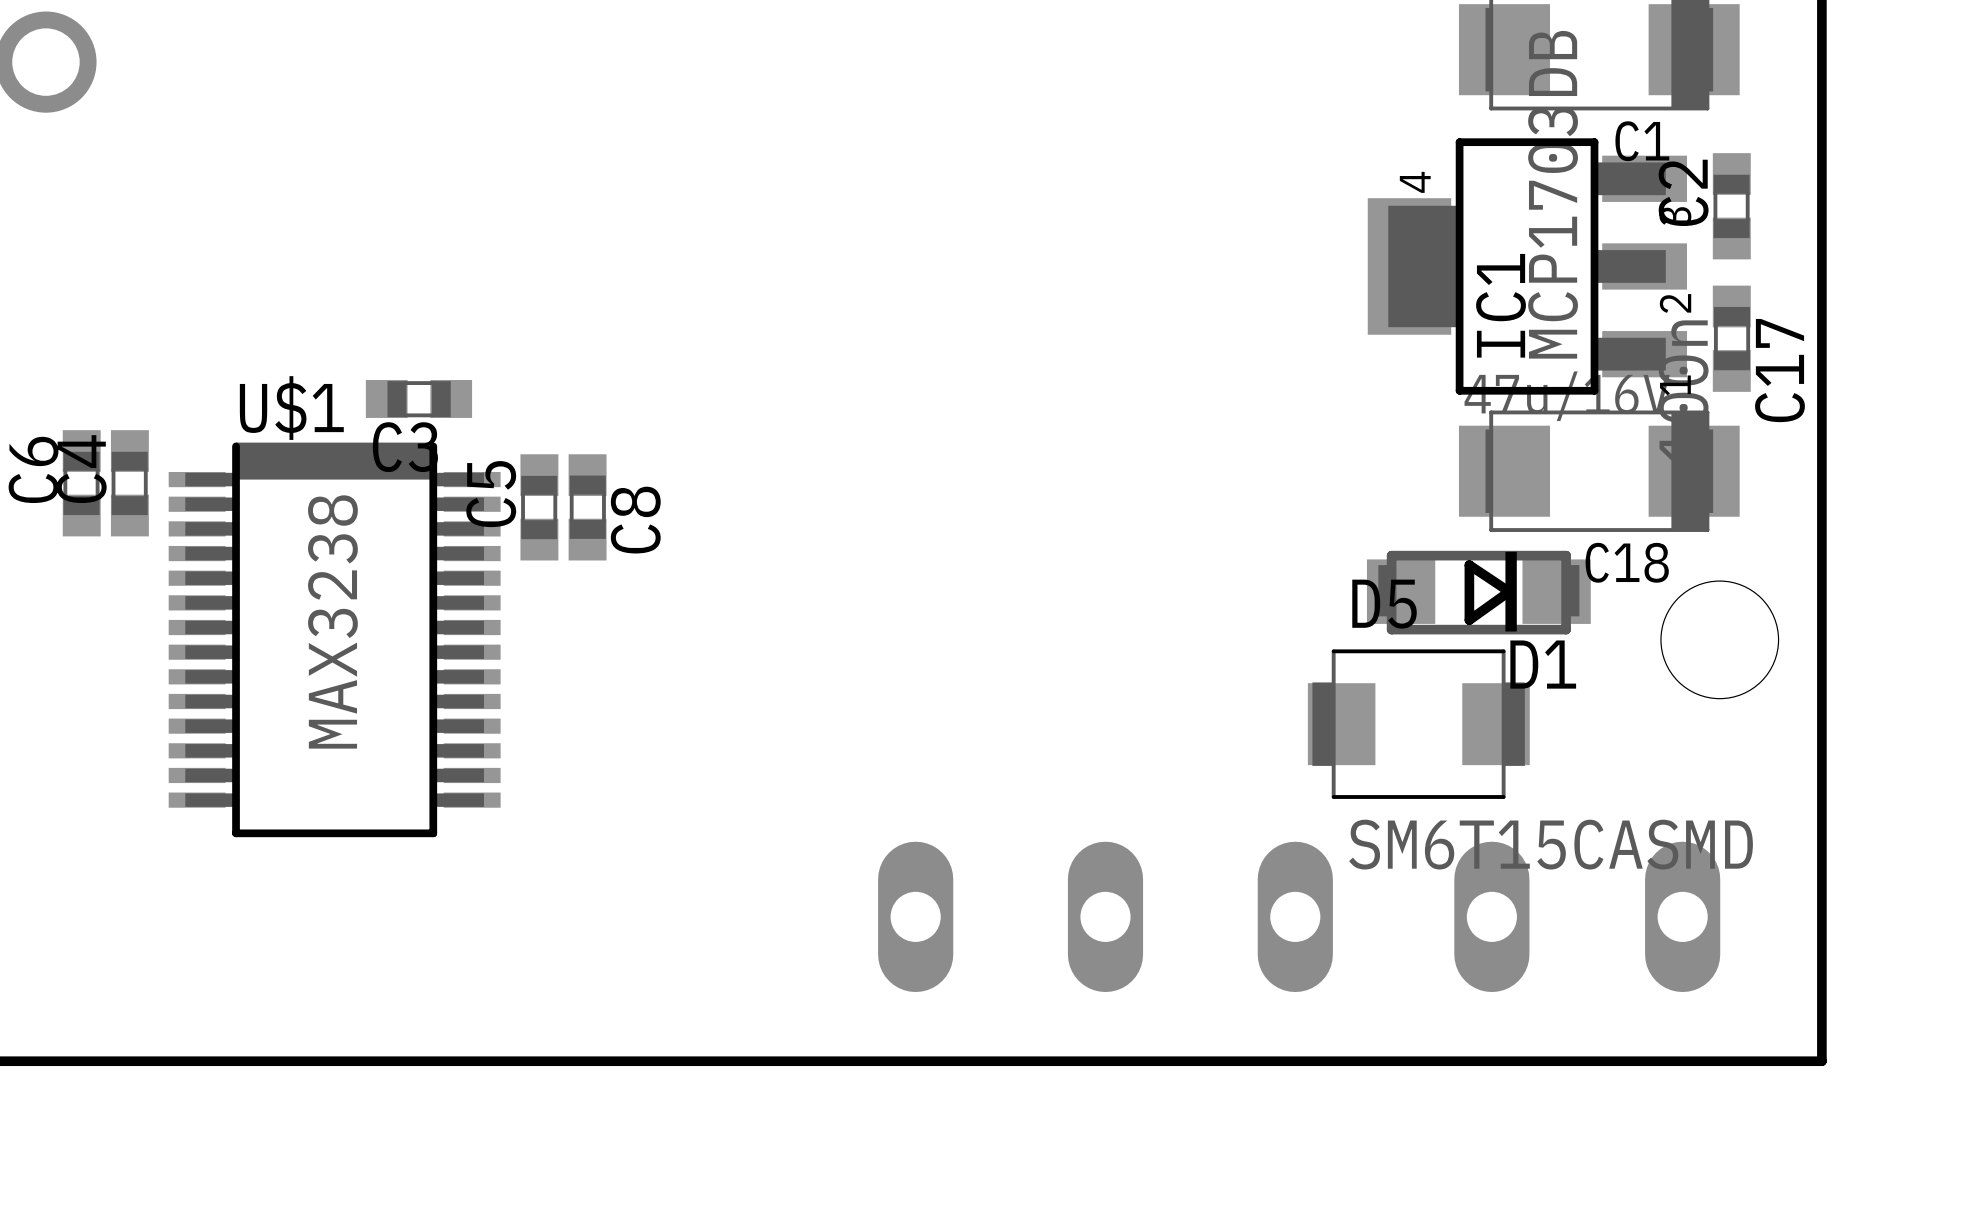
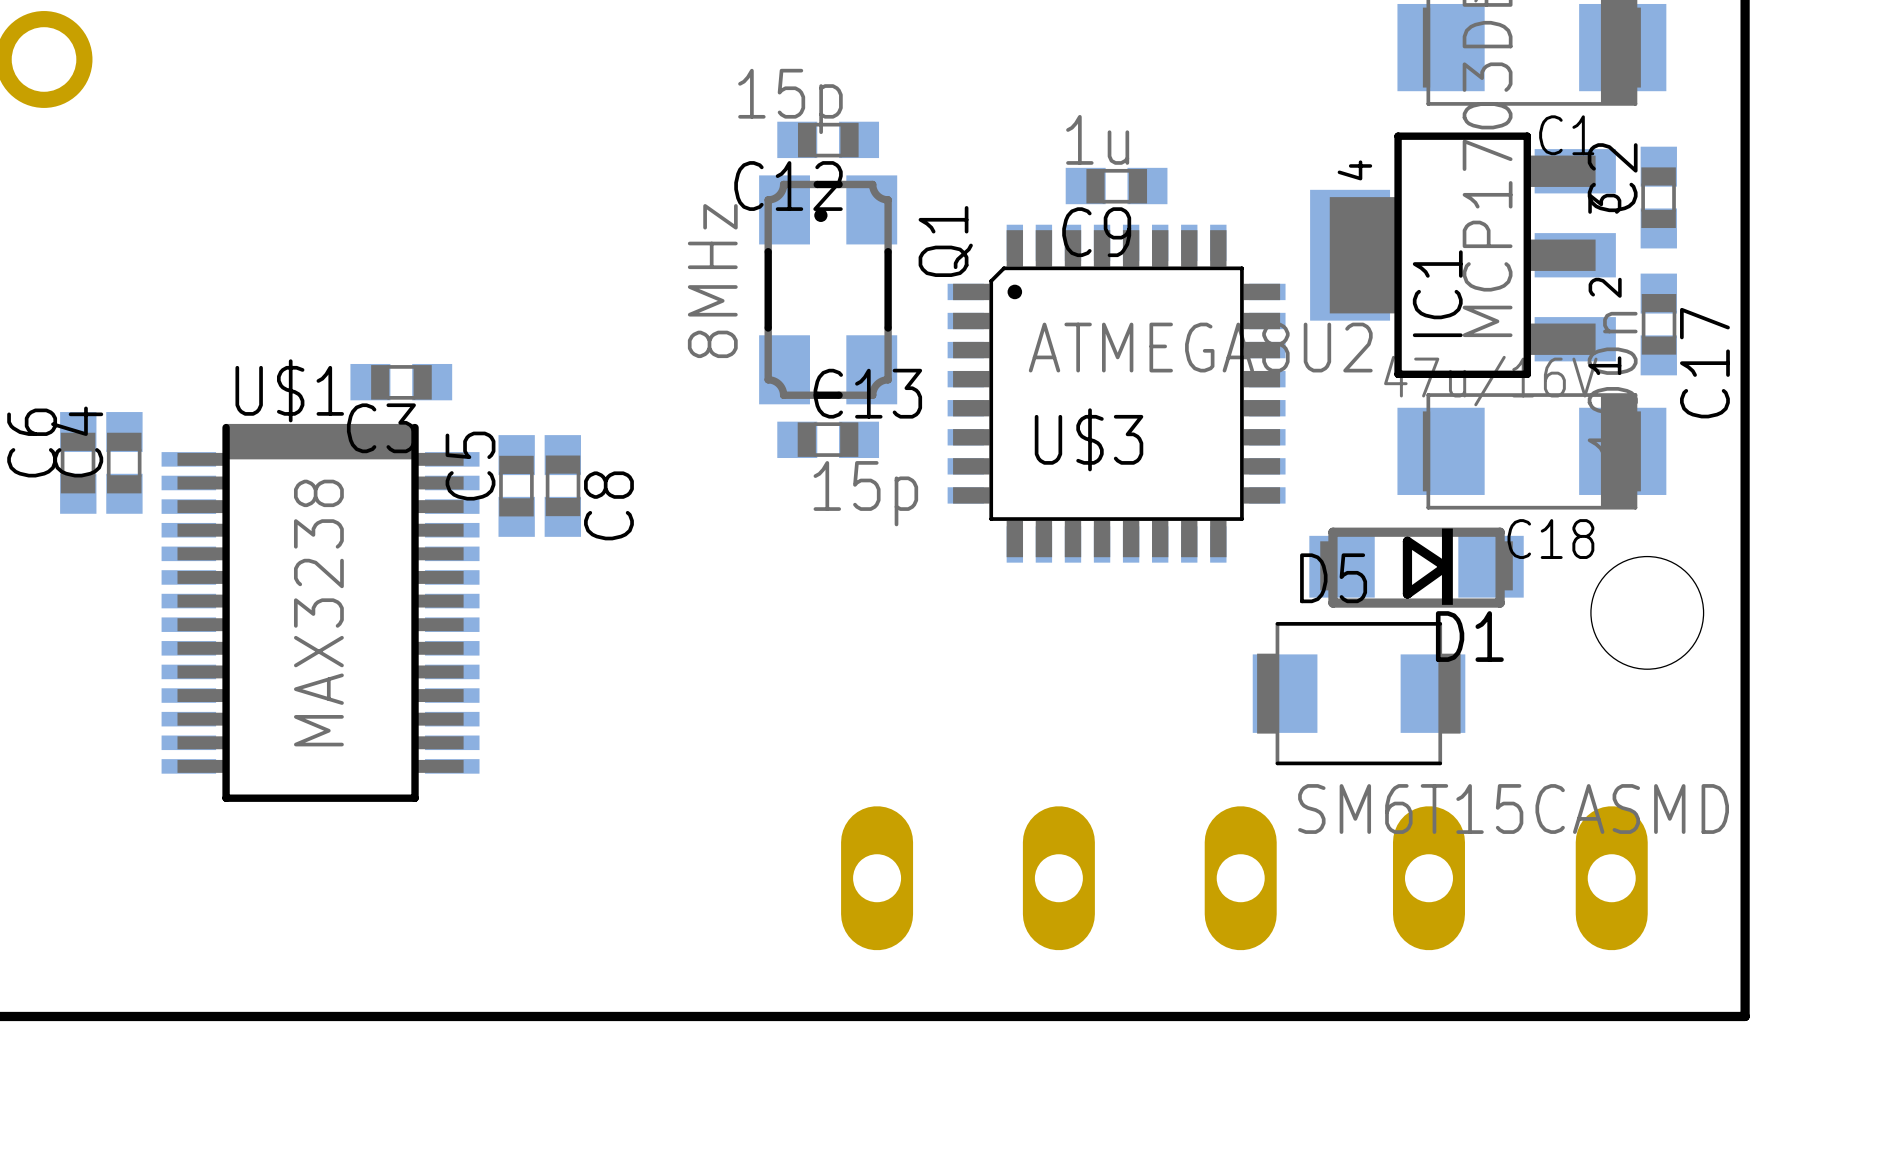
C12: none -> 15p (828, 139)
C9: none -> 1u (1116, 186)
Q1: none -> 8MHz (828, 289)
U$3: none -> ATMEGA8U2 (1116, 393)
C13: none -> 15p (828, 439)

